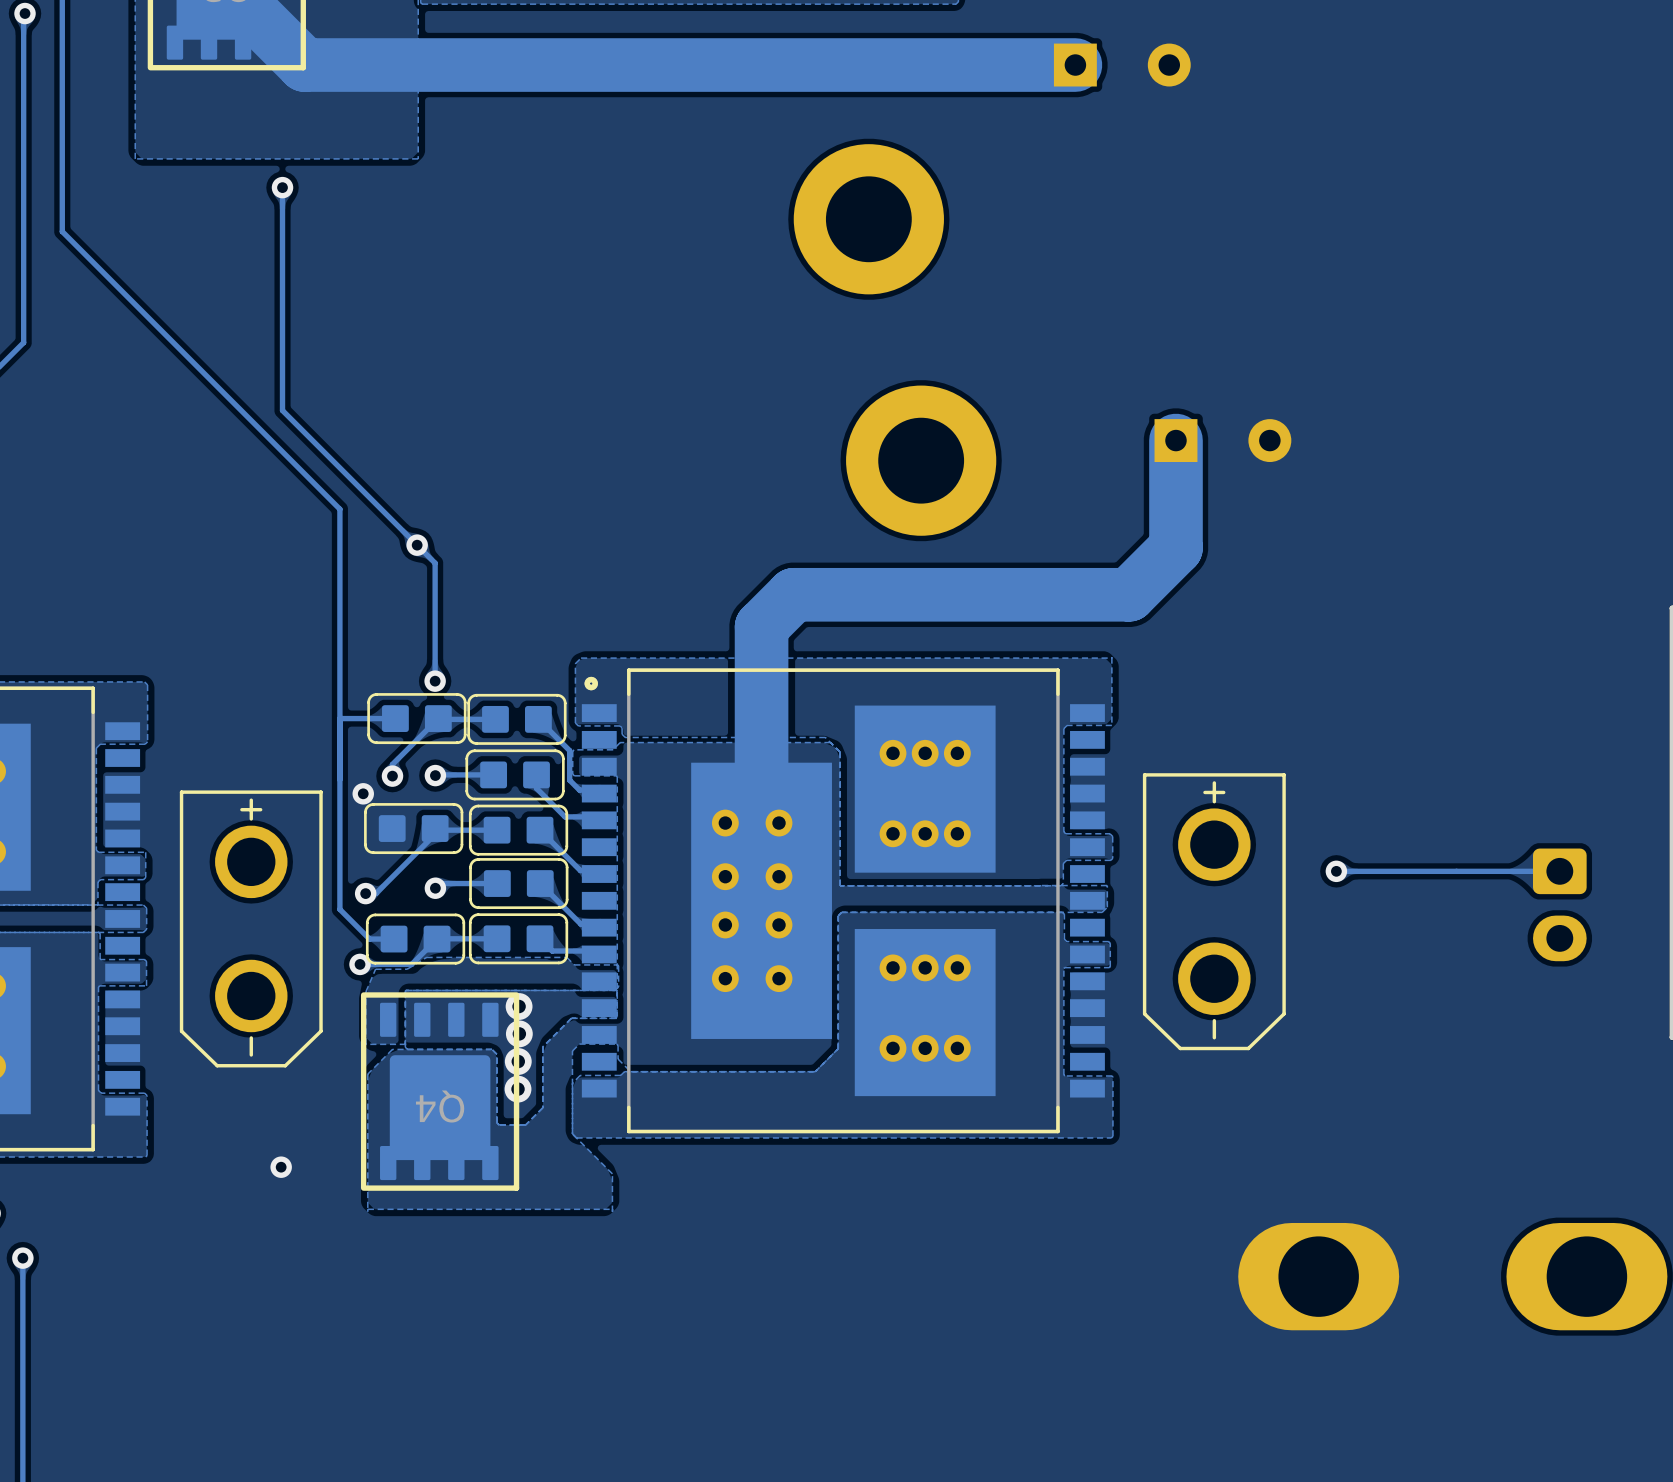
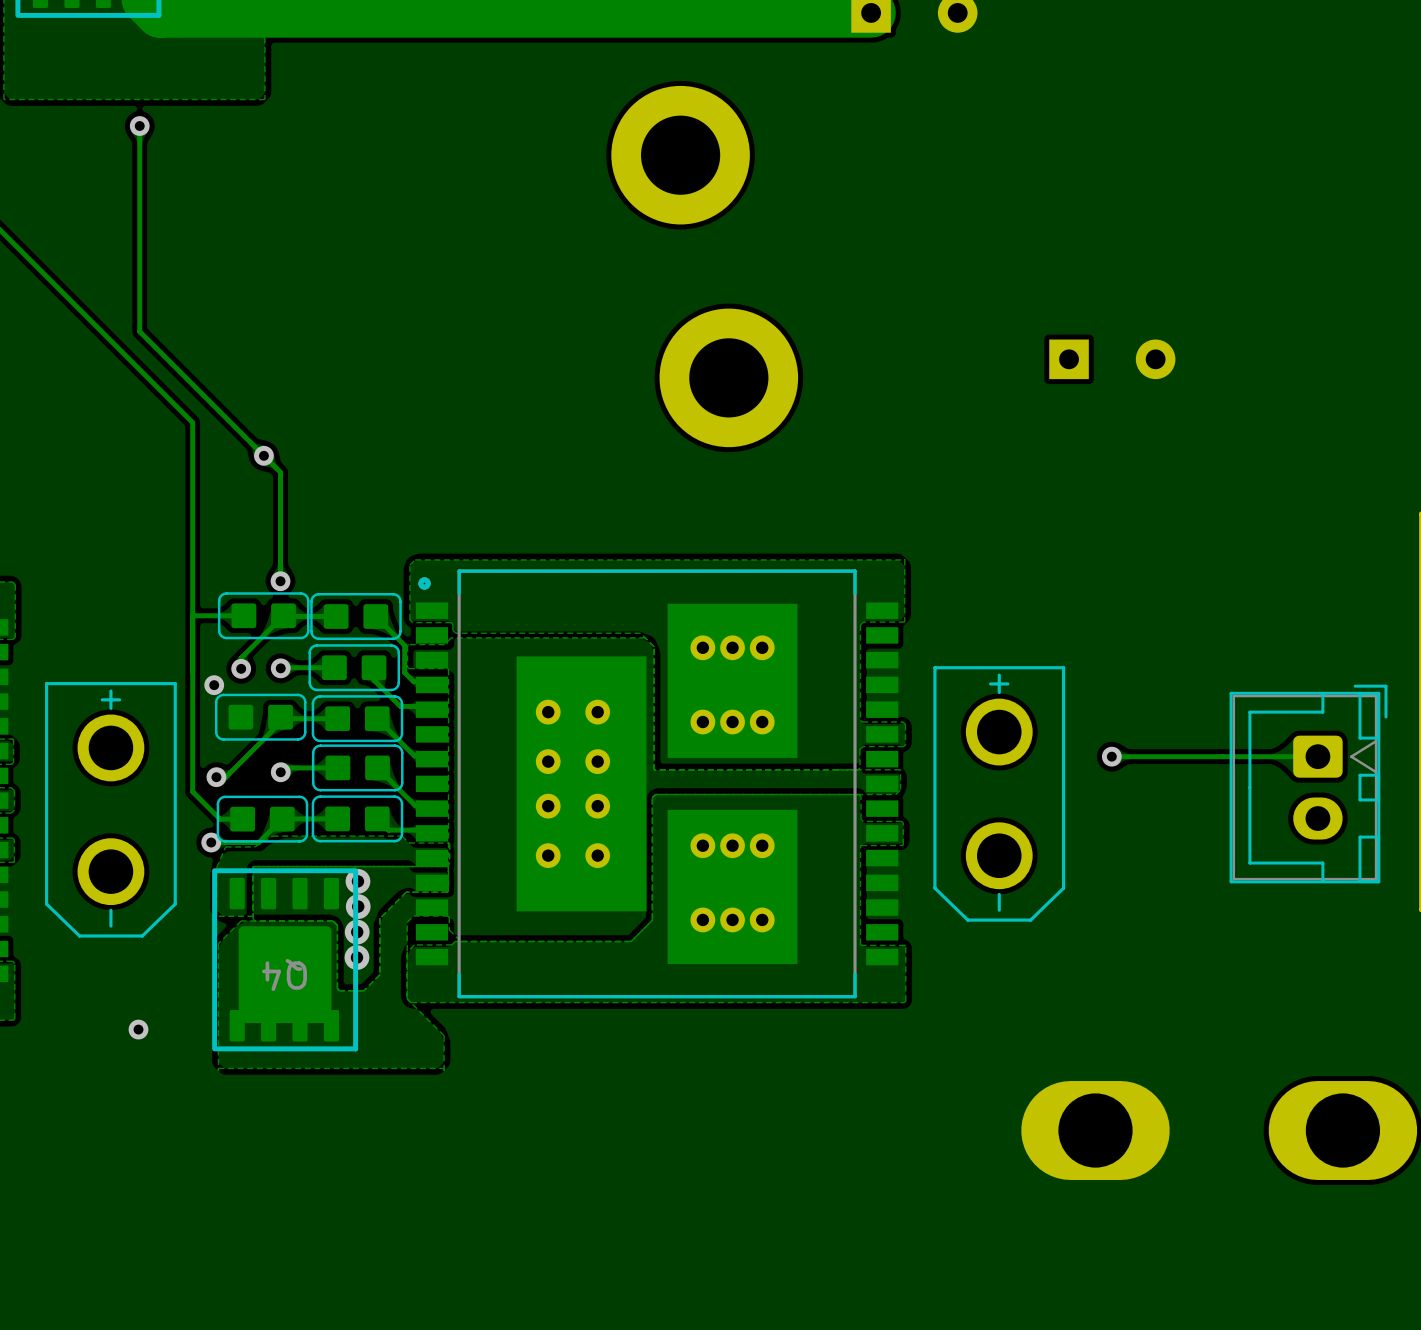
track: (1175, 440) (1175, 547) (1129, 594) (793, 594) (761, 626) (761, 900) -> none
part position: (1222, 440) -> (1112, 359)
part side: top (1559, 904) -> bottom (1308, 784)

